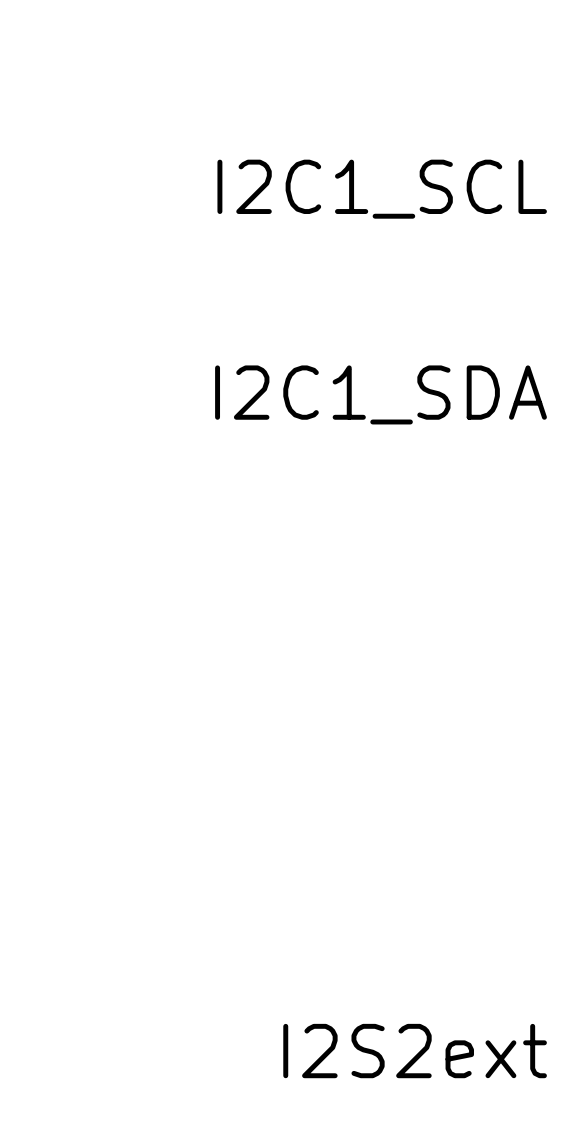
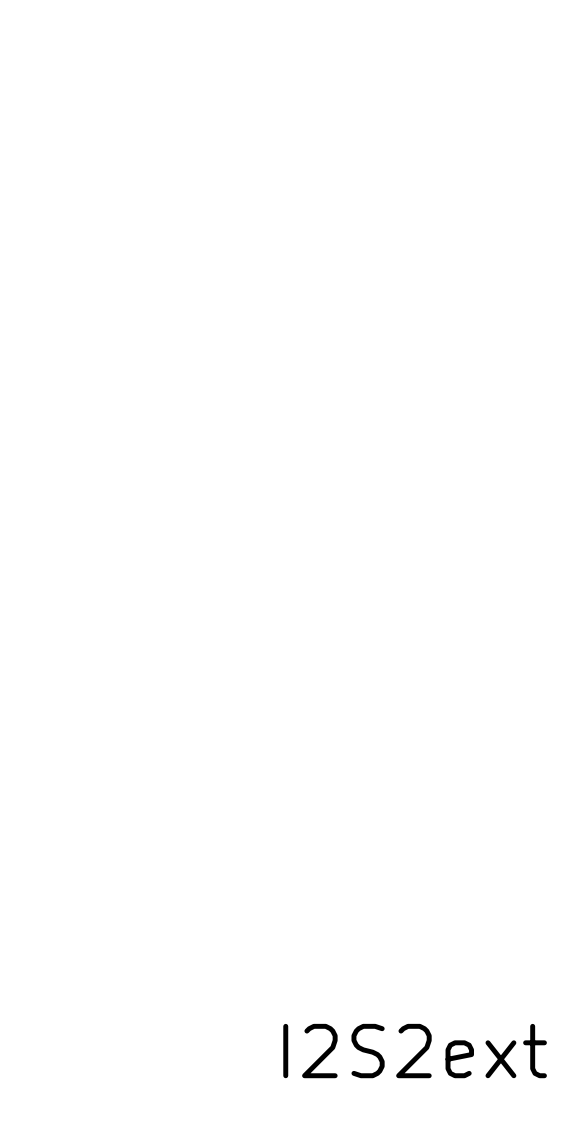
label: I2C1_SCL (382, 189) -> none
label: I2C1_SDA (380, 394) -> none

